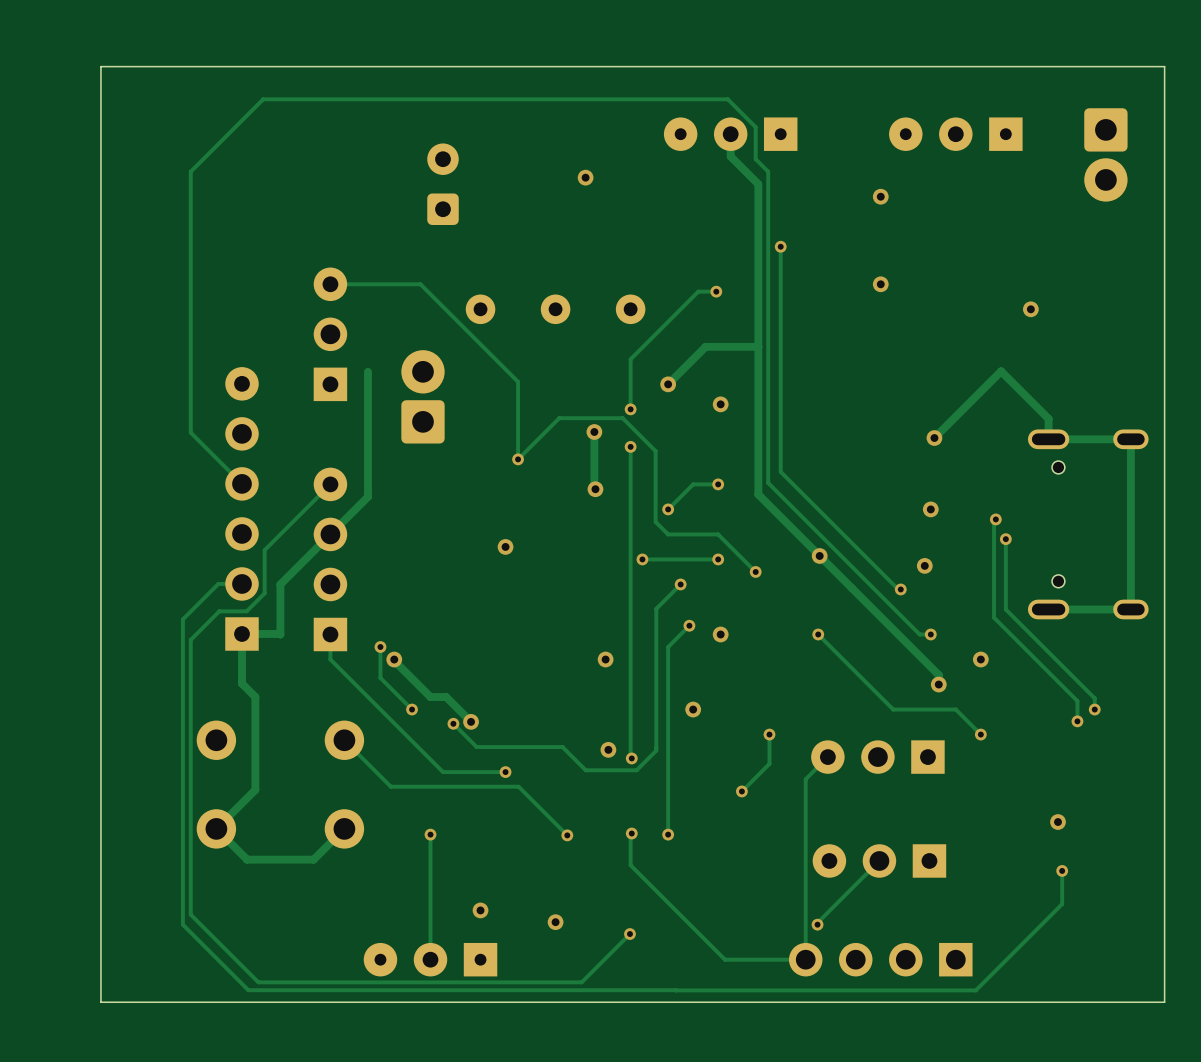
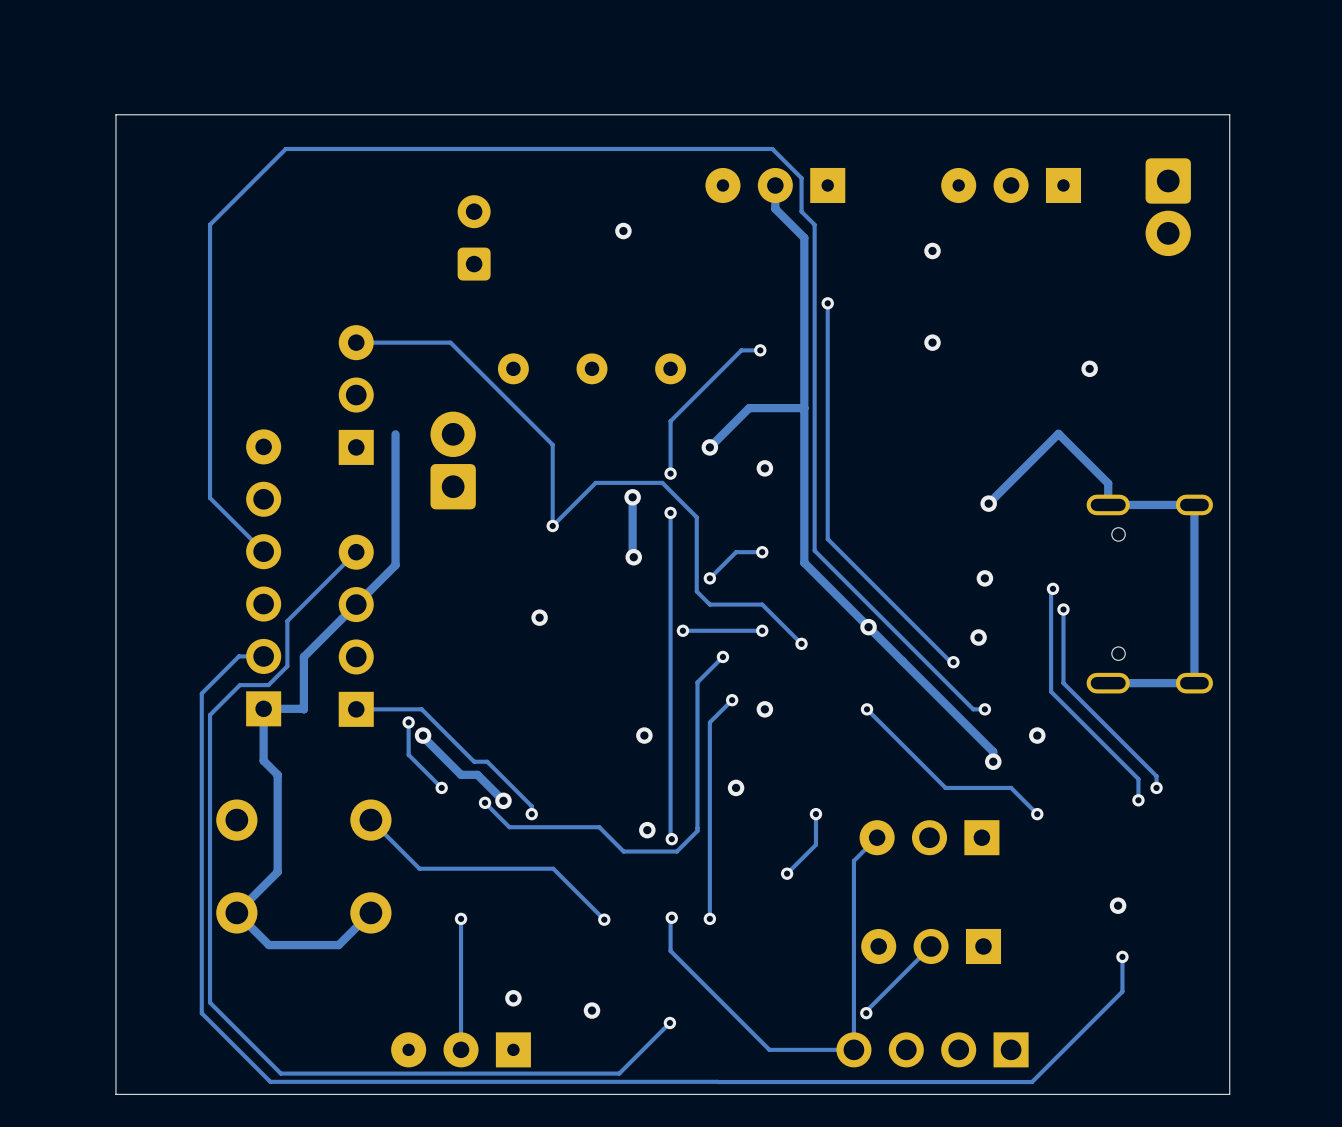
track: (330, 634) (330, 659) (443, 772) (505, 772) (502, 774) -> (356, 709) (421, 709) (474, 761) (487, 761) (531, 806) (531, 814)
via position: (505, 772) -> (531, 814)

